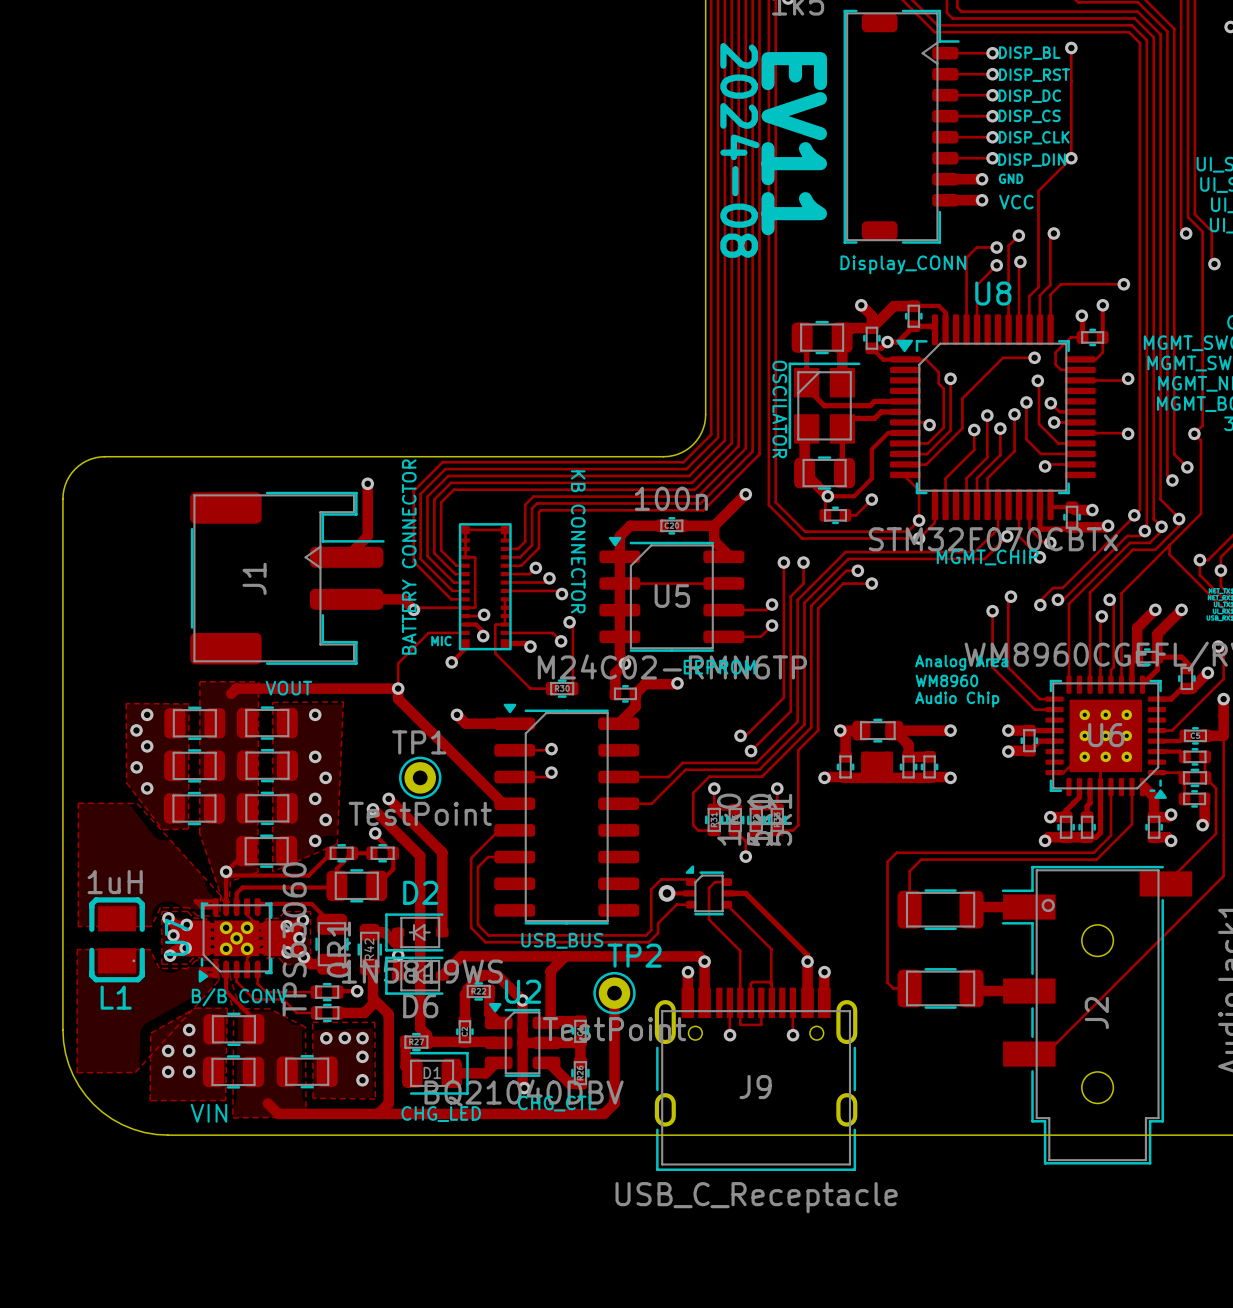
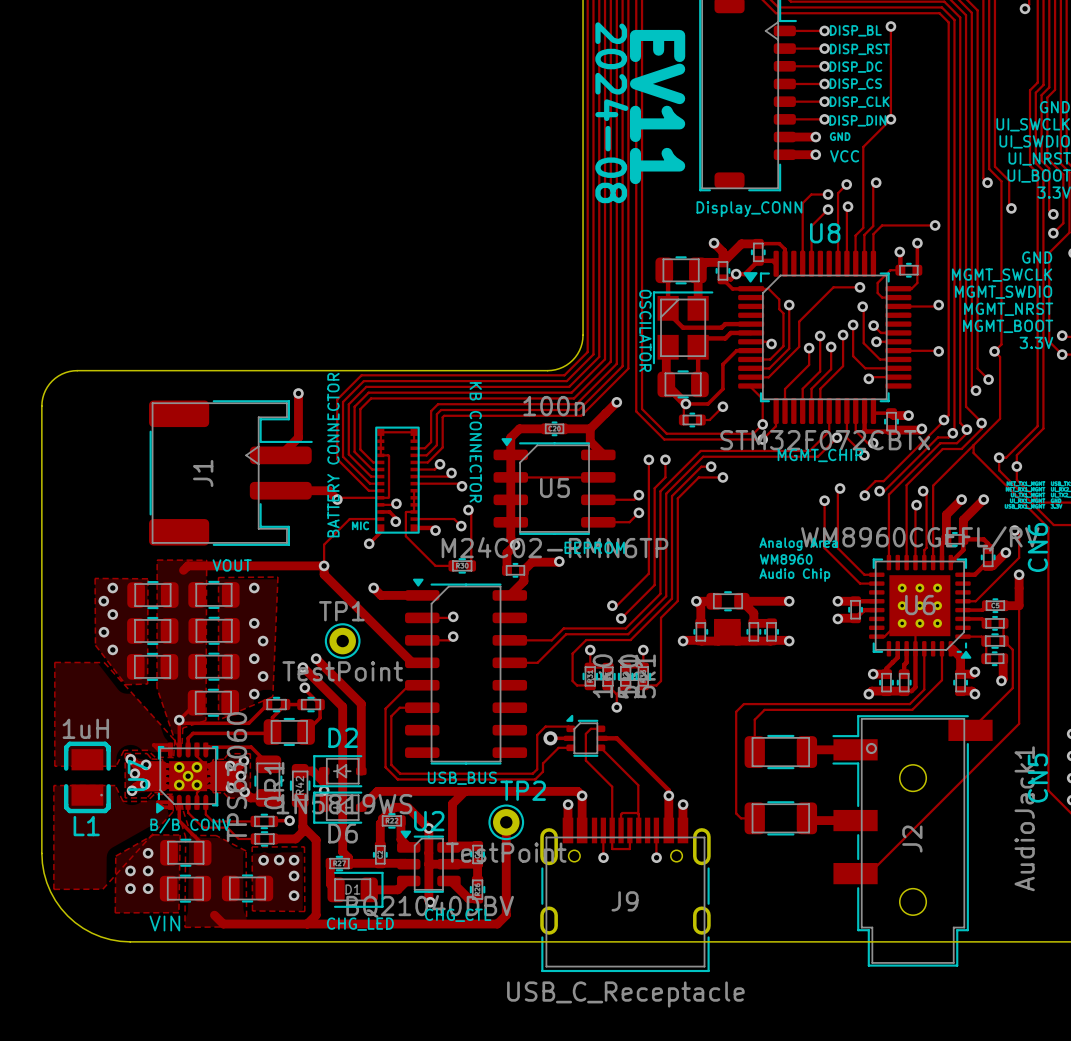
U8 value: STM32F070CBTx (993, 539) -> STM32F072CBTx (825, 440)

